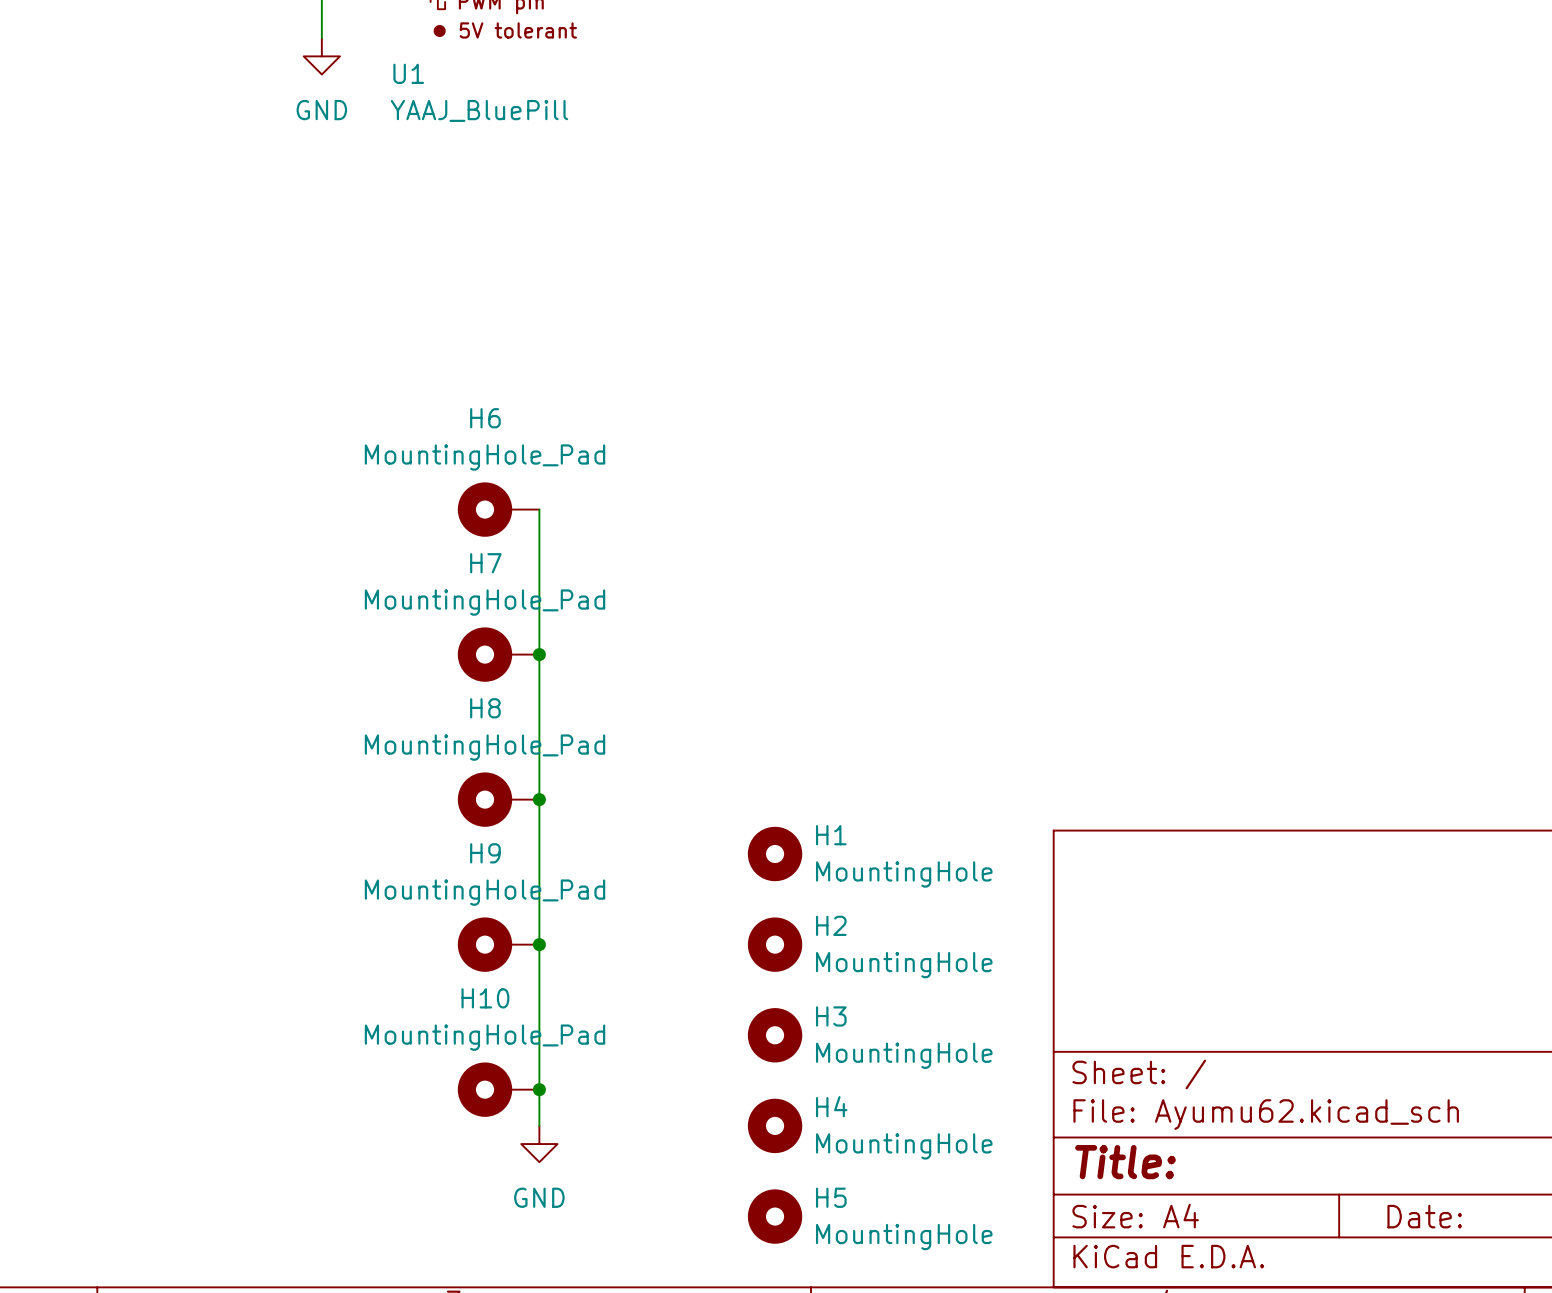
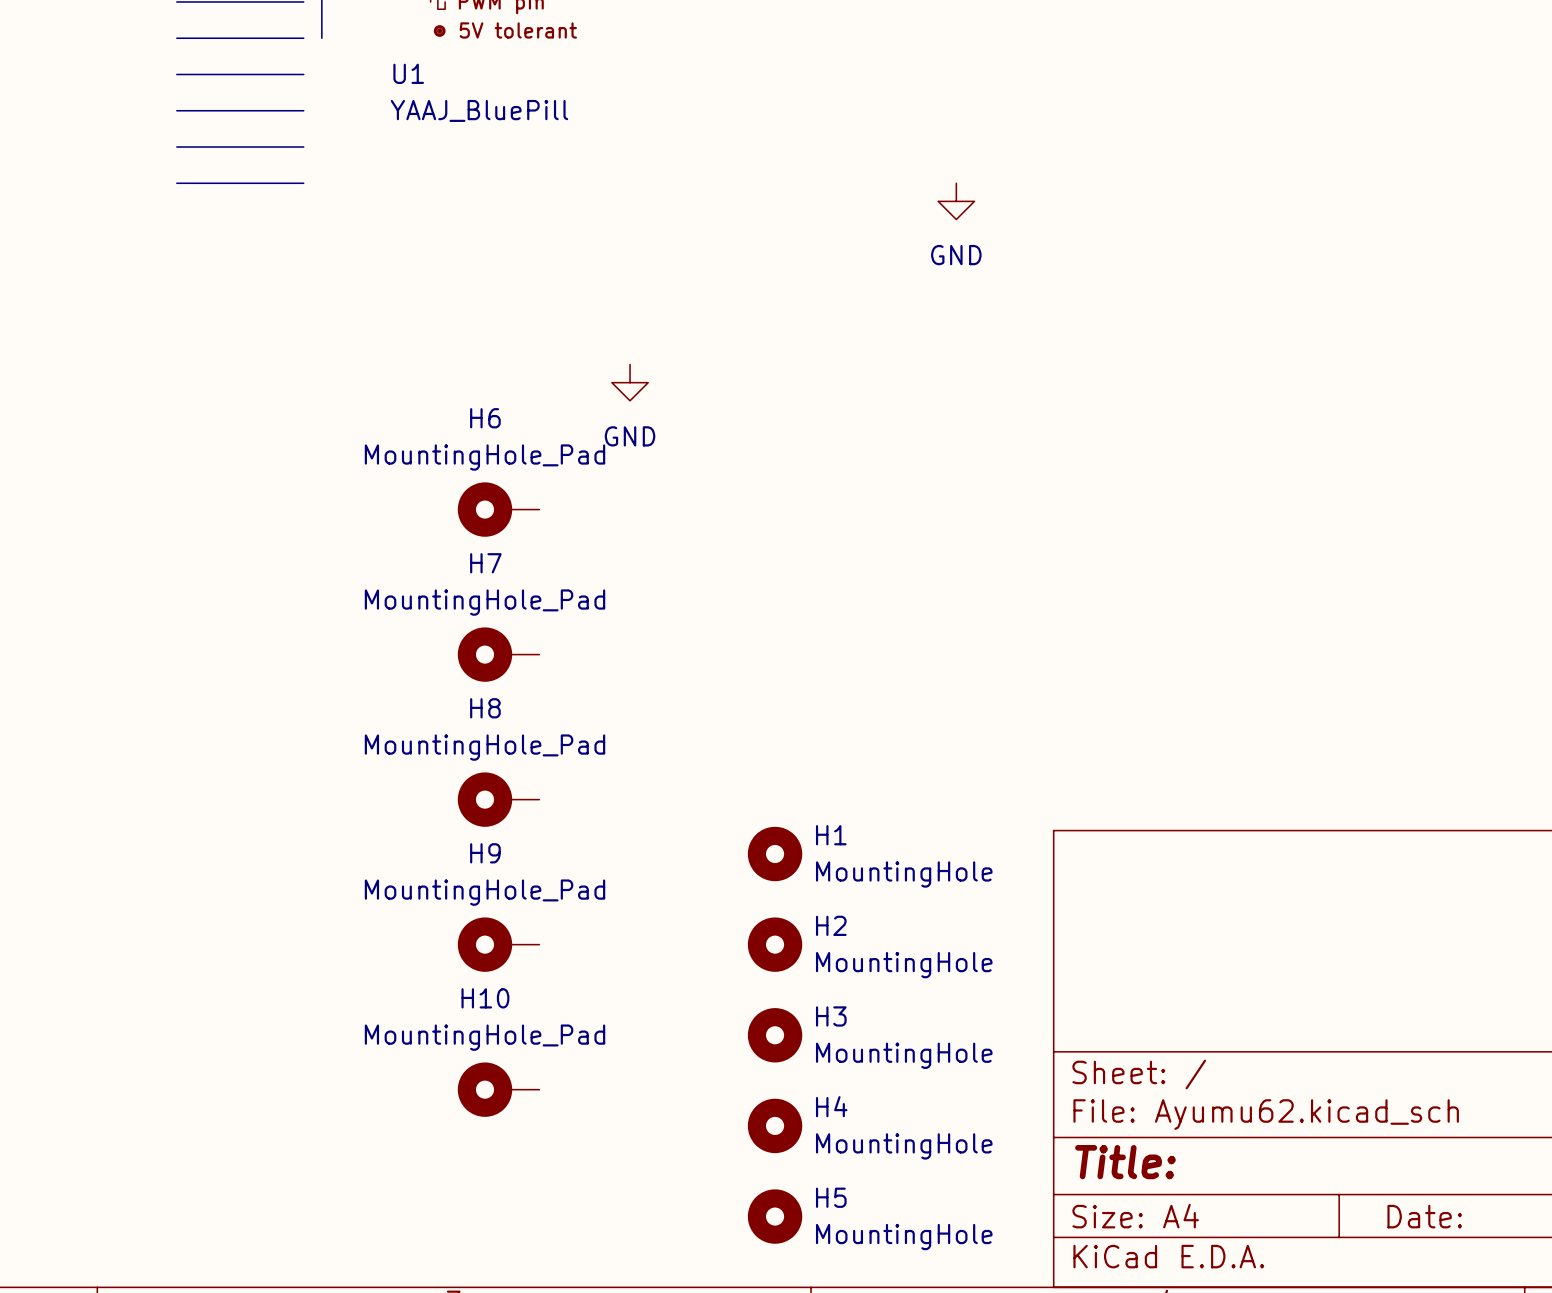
wire: none -> (176, 1) (303, 1)
wire: none -> (176, 38) (303, 38)
power symbol: GND (321, 56) -> none
wire: none -> (176, 74) (303, 74)
wire: none -> (176, 110) (303, 110)
wire: none -> (176, 147) (303, 147)
wire: none -> (176, 183) (303, 183)
power symbol: none -> GND (956, 201)
power symbol: none -> GND (630, 382)
wire: (539, 509) (539, 1125) -> none
junction: (539, 654) -> none
junction: (539, 799) -> none
junction: (539, 944) -> none
junction: (539, 1089) -> none
power symbol: GND (539, 1144) -> none

